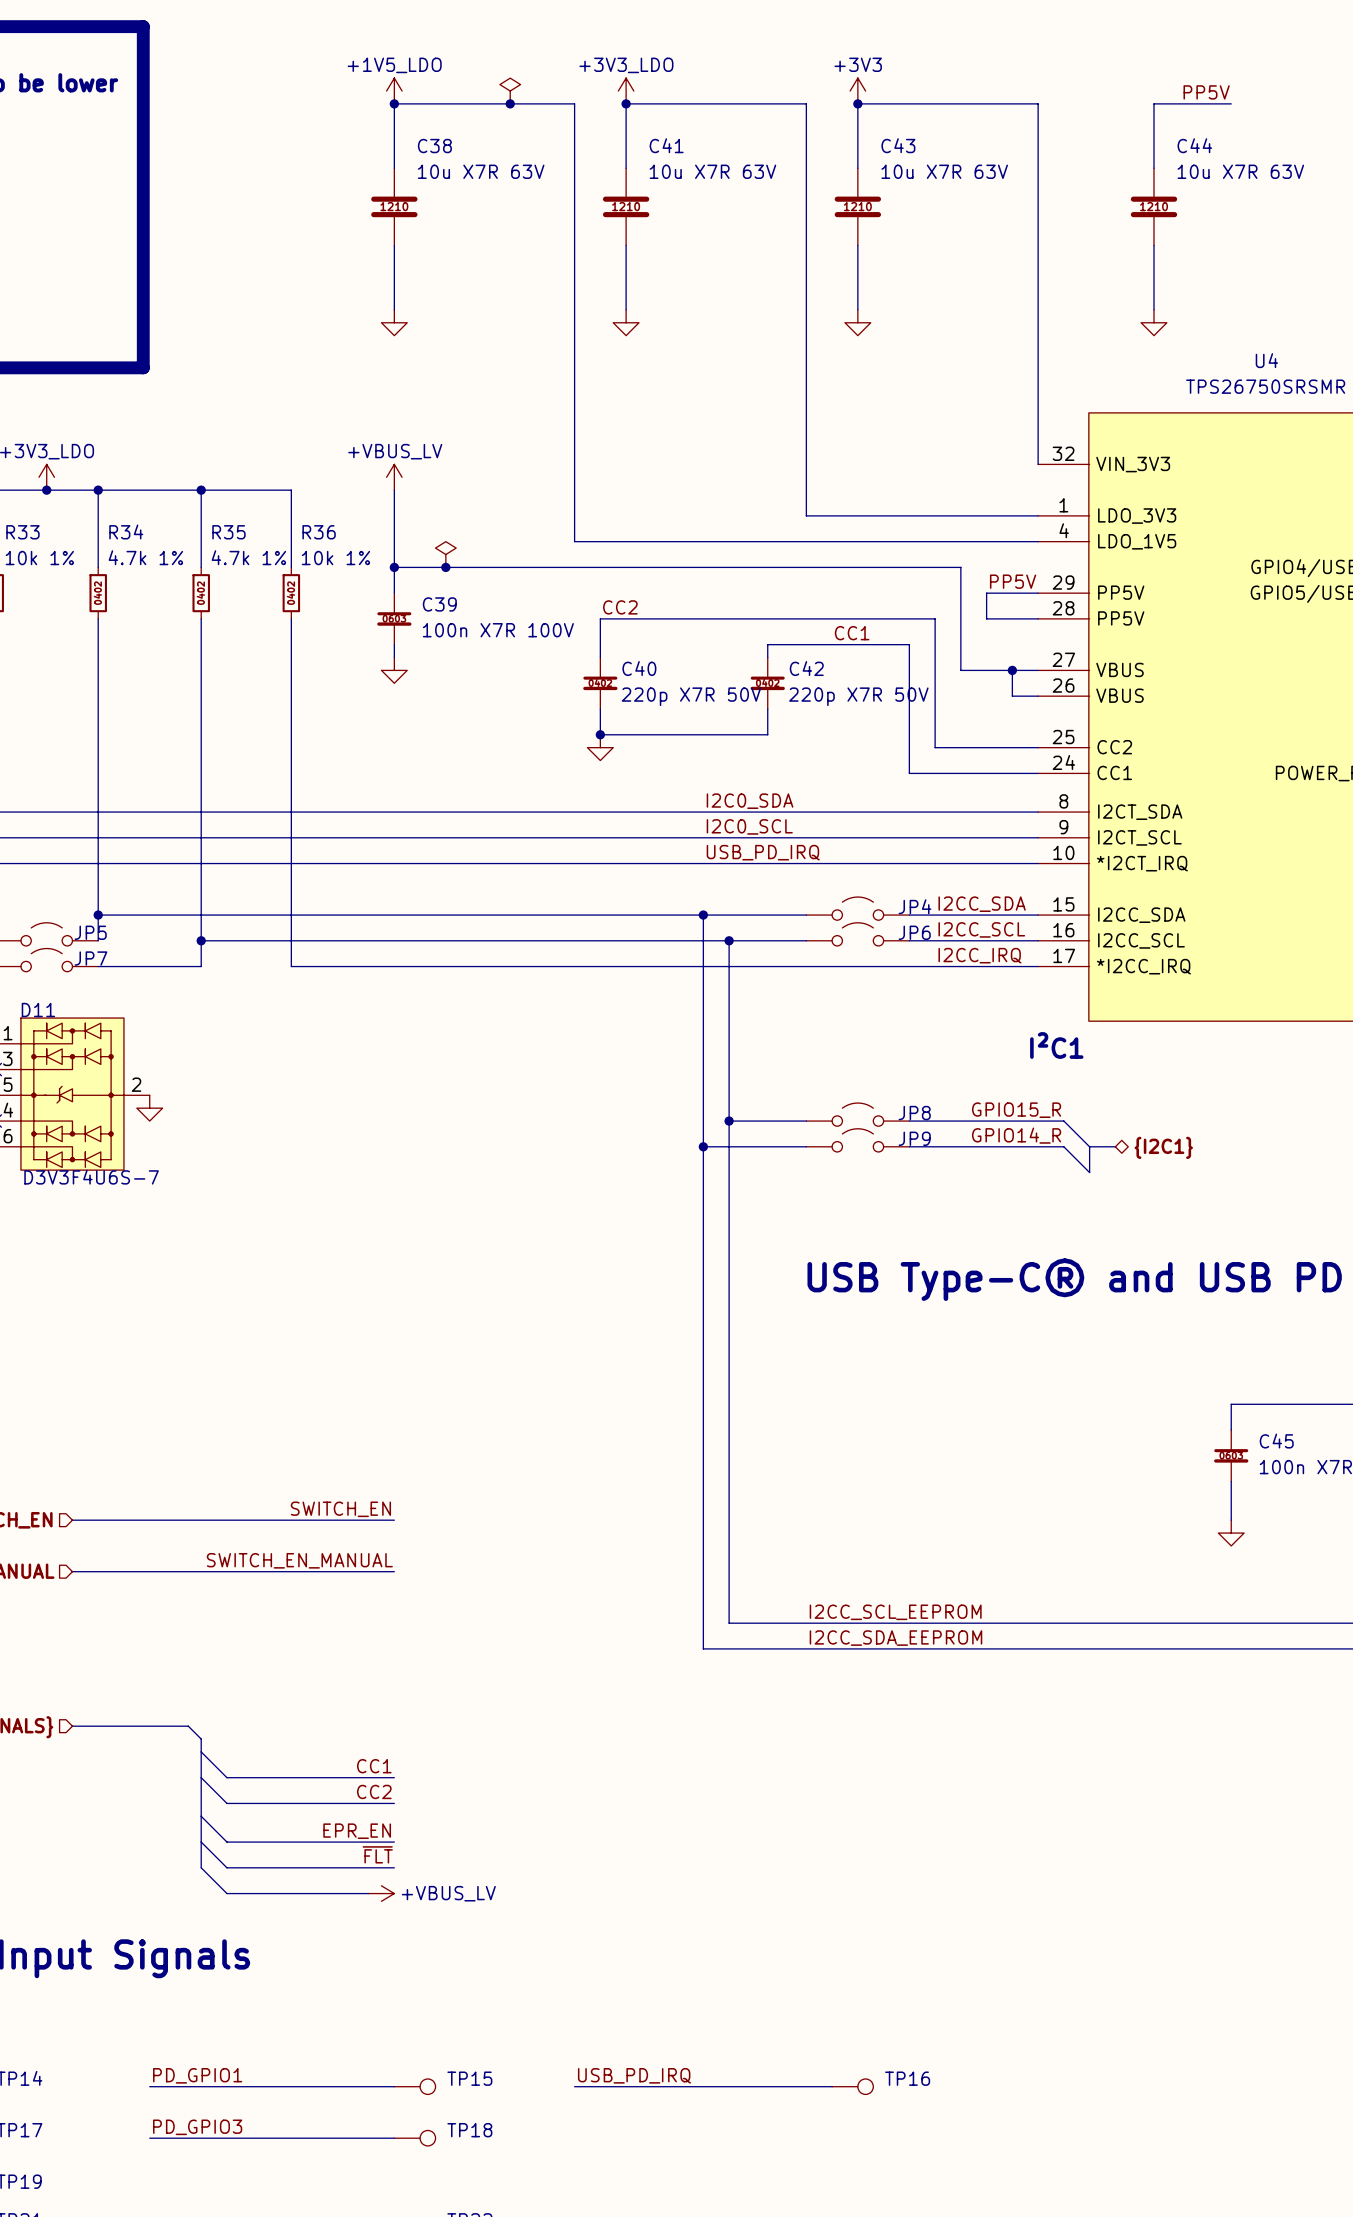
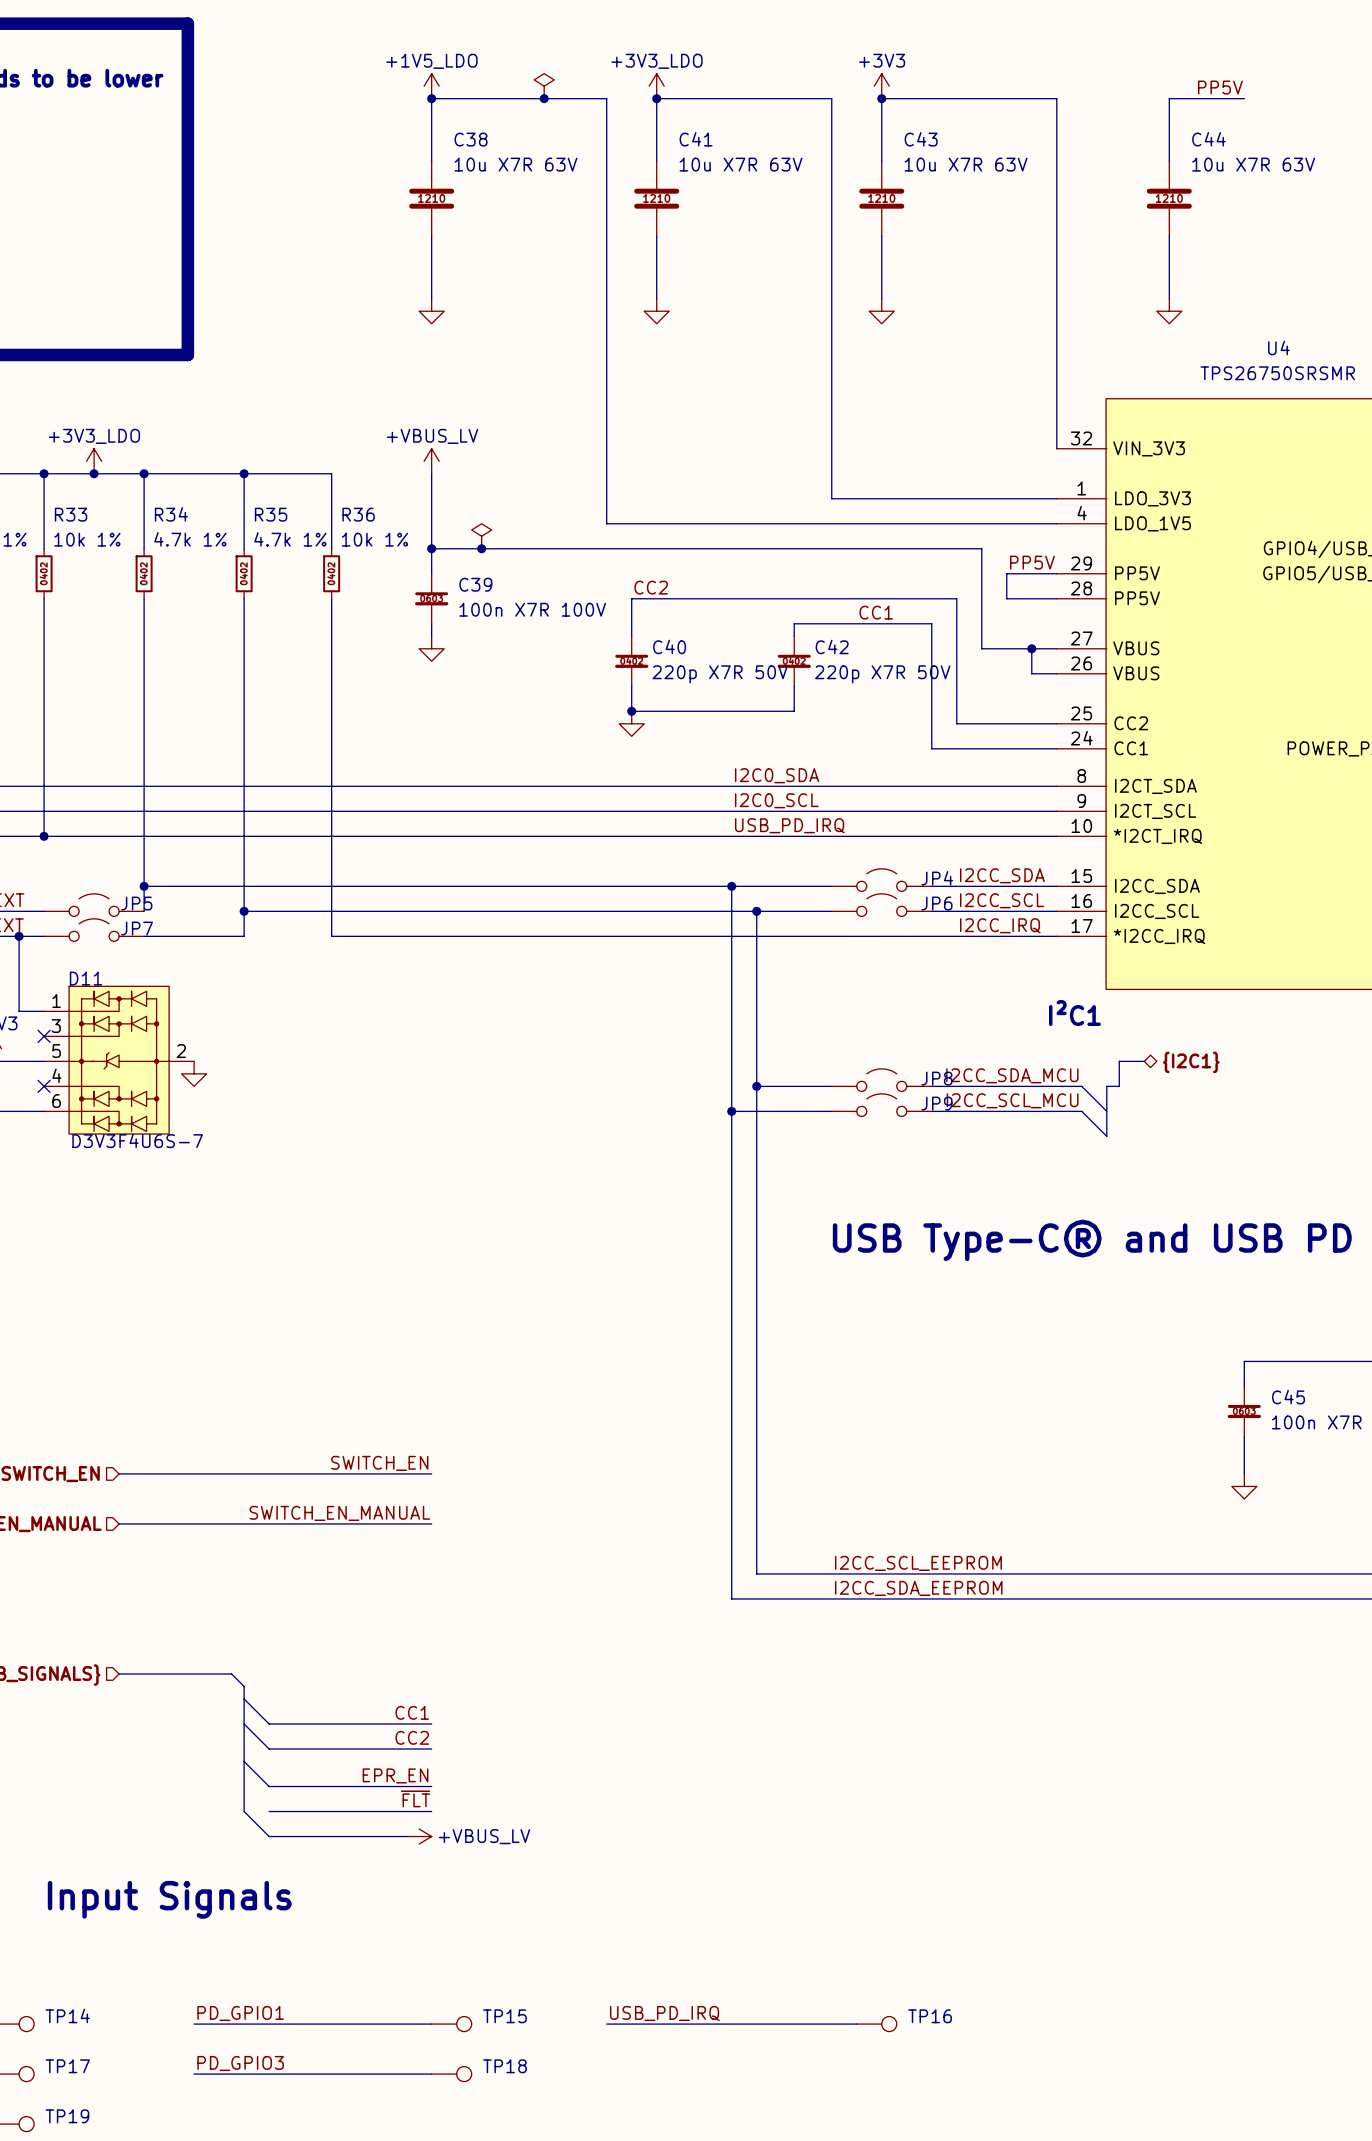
label: GPIO15_R (1016, 1110) -> I2CC_SDA_MCU (1012, 1075)
label: GPIO14_R (1016, 1135) -> I2CC_SCL_MCU (1012, 1100)
bus: (1089, 1146) (1115, 1146) -> (1106, 1111) (1106, 1086) (1119, 1086) (1119, 1061) (1144, 1061)
hierarchical label position: {I2C1} (1163, 1147) -> {I2C1} (1191, 1062)
wire: (201, 1842) (226, 1867) -> none

